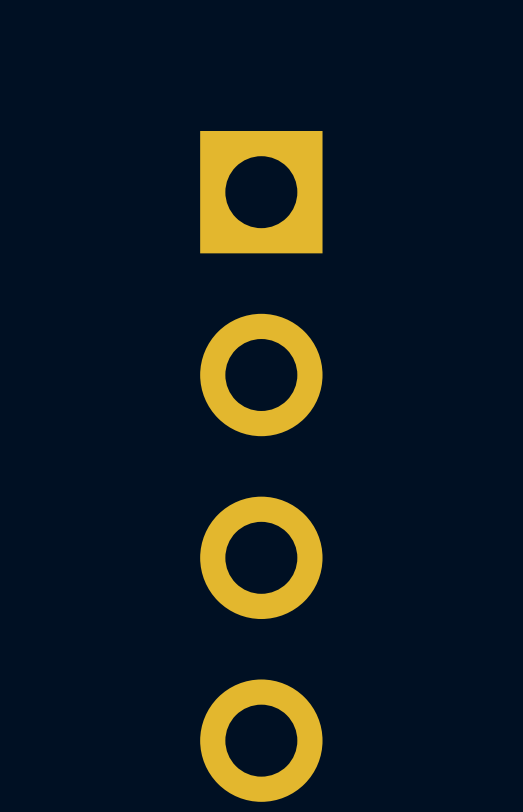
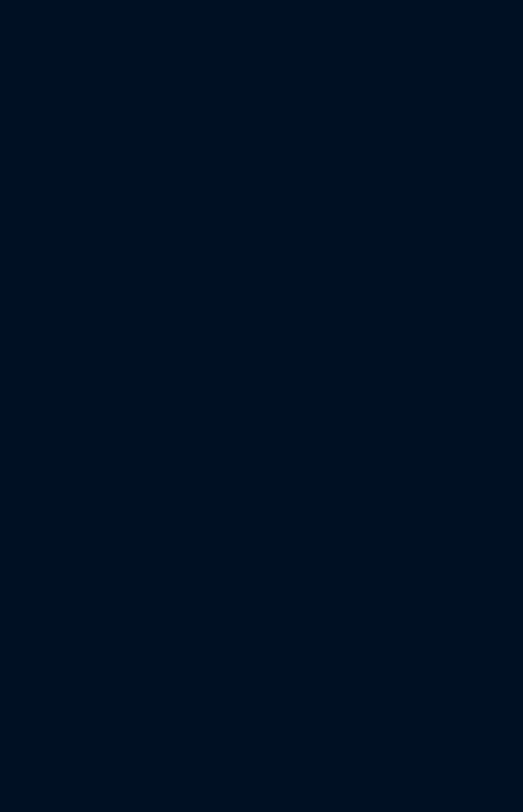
part: (261, 466) -> none

